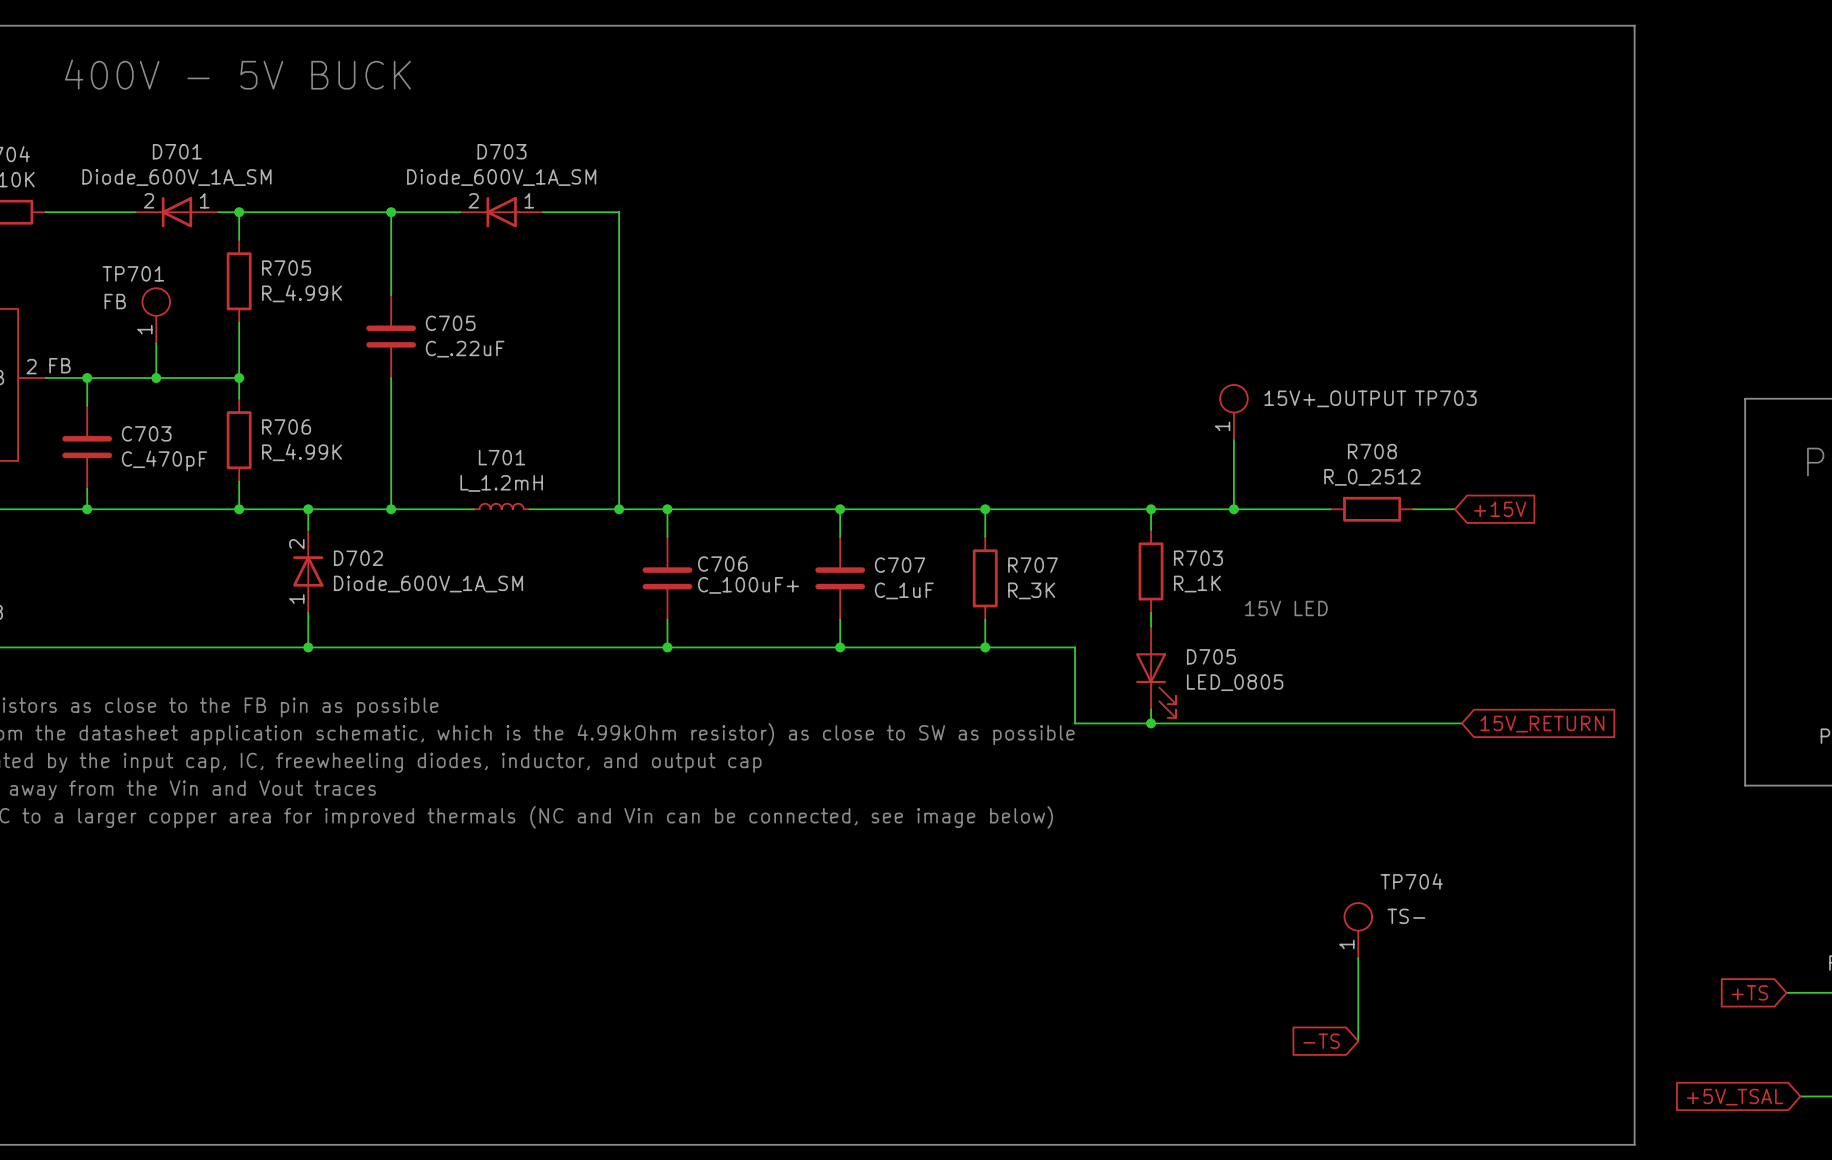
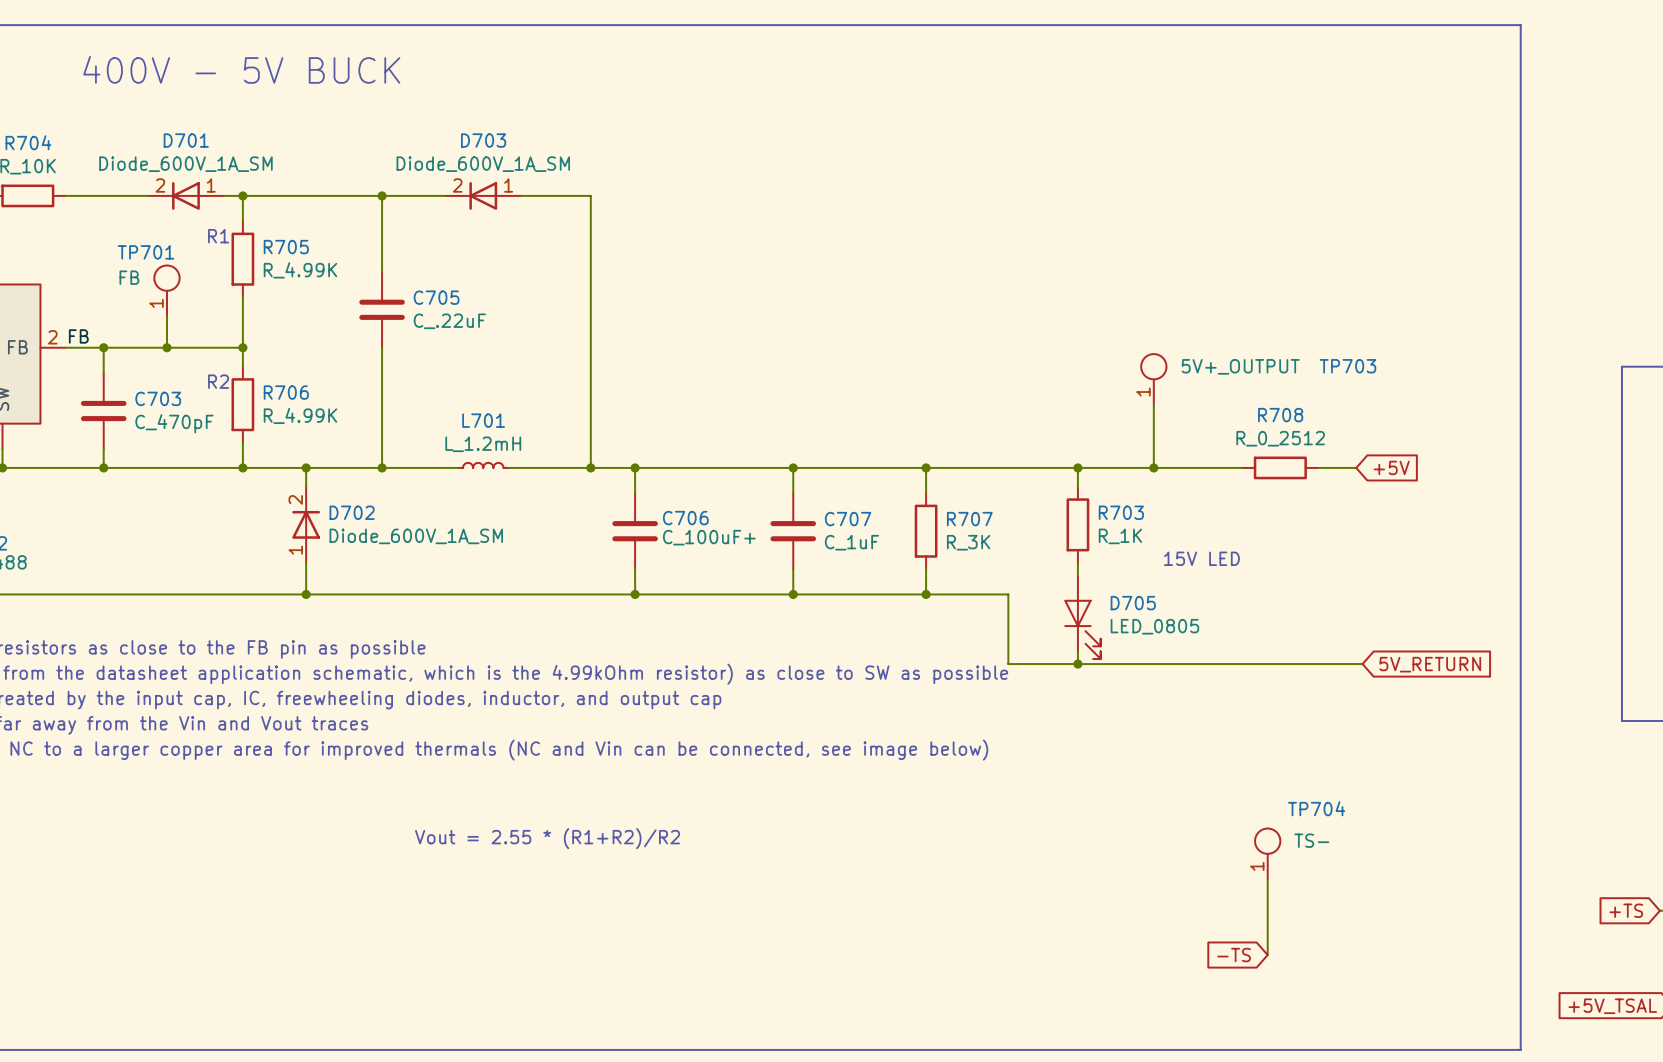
text: none -> R1 (218, 236)
TP703 value: 15V+_OUTPUT (1335, 398) -> 5V+_OUTPUT (1240, 366)
text: none -> R2 (218, 381)
global label: +15V (1500, 509) -> +5V (1391, 467)
global label: 15V_RETURN (1542, 724) -> 5V_RETURN (1430, 664)
text: none -> Vout = 2.55 * (R1+R2)/R2 (547, 838)

